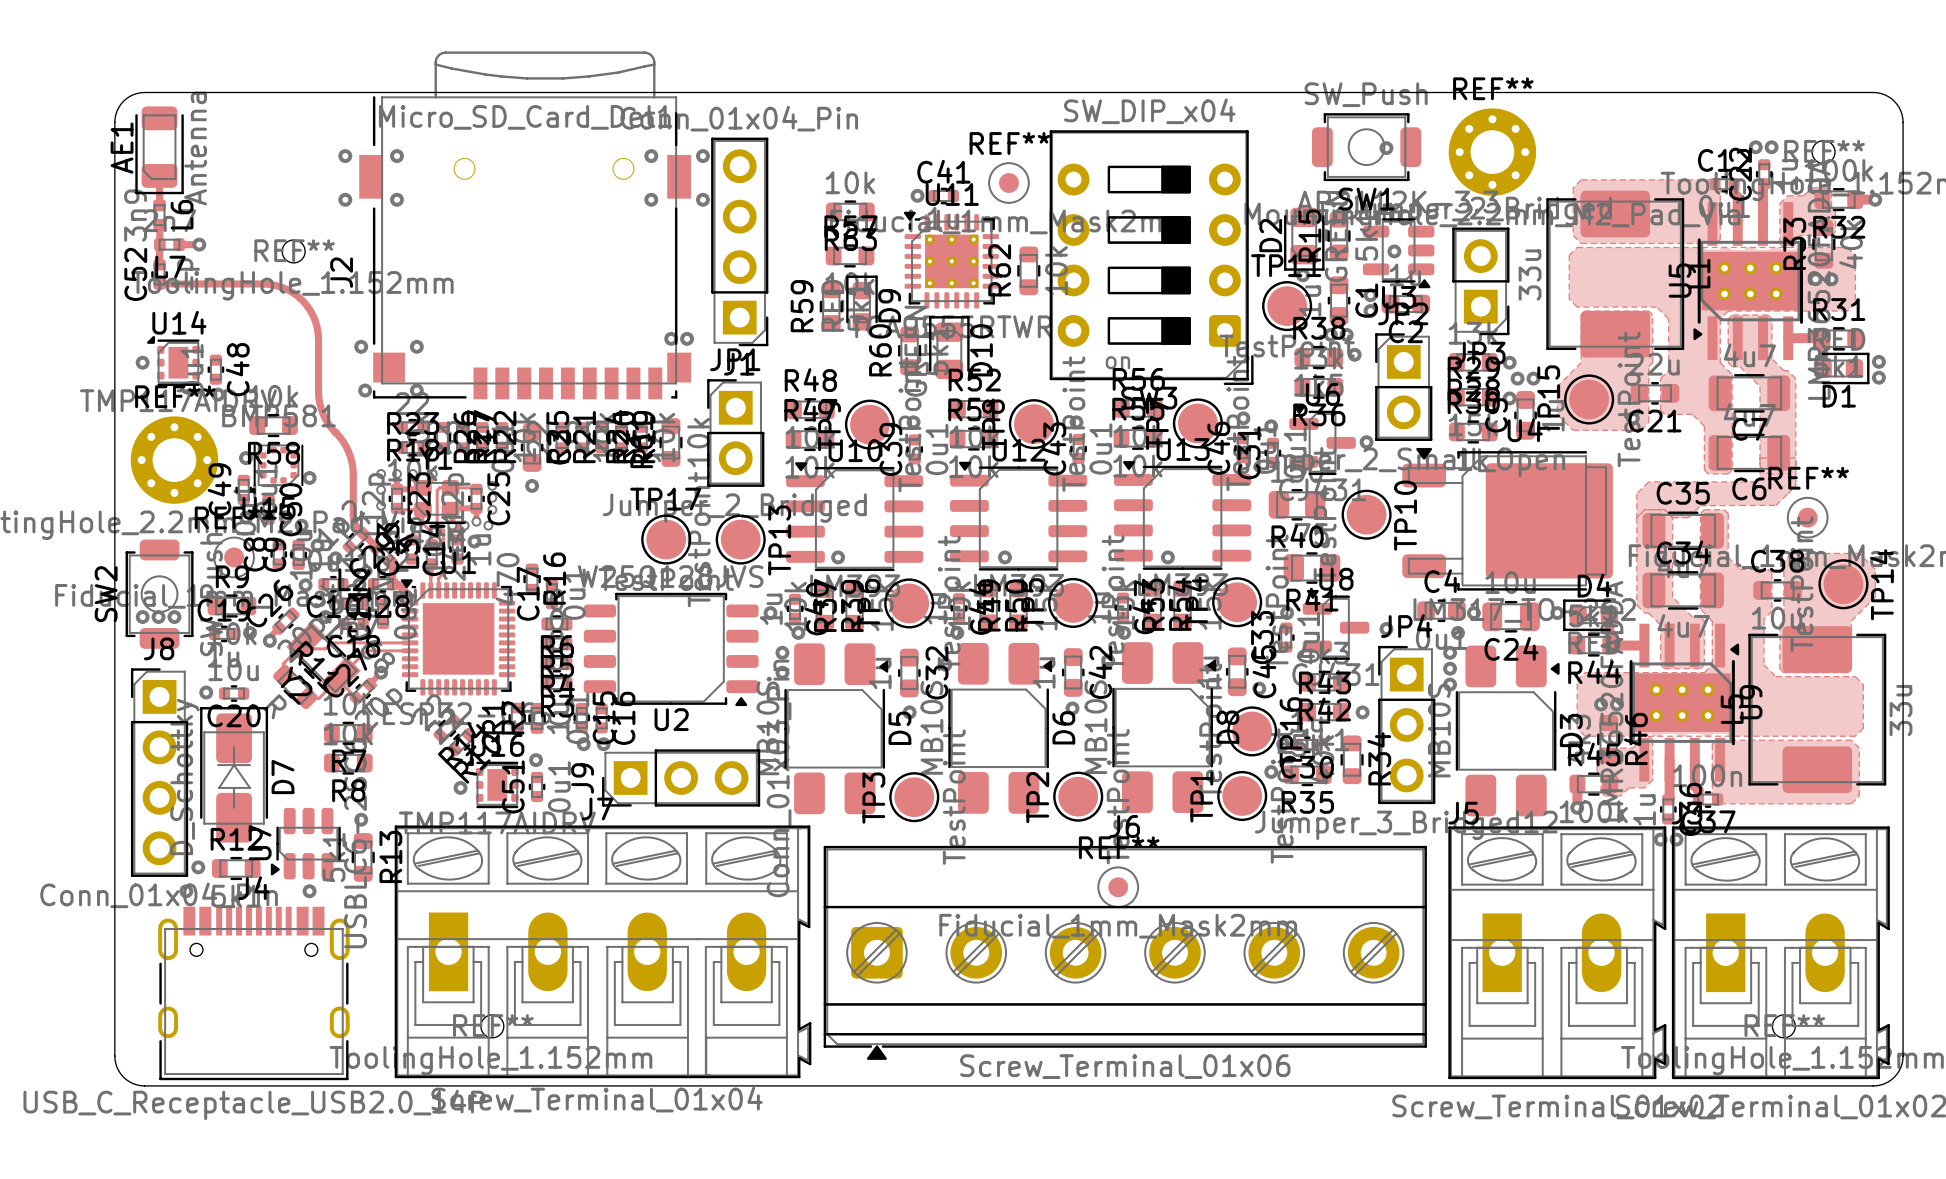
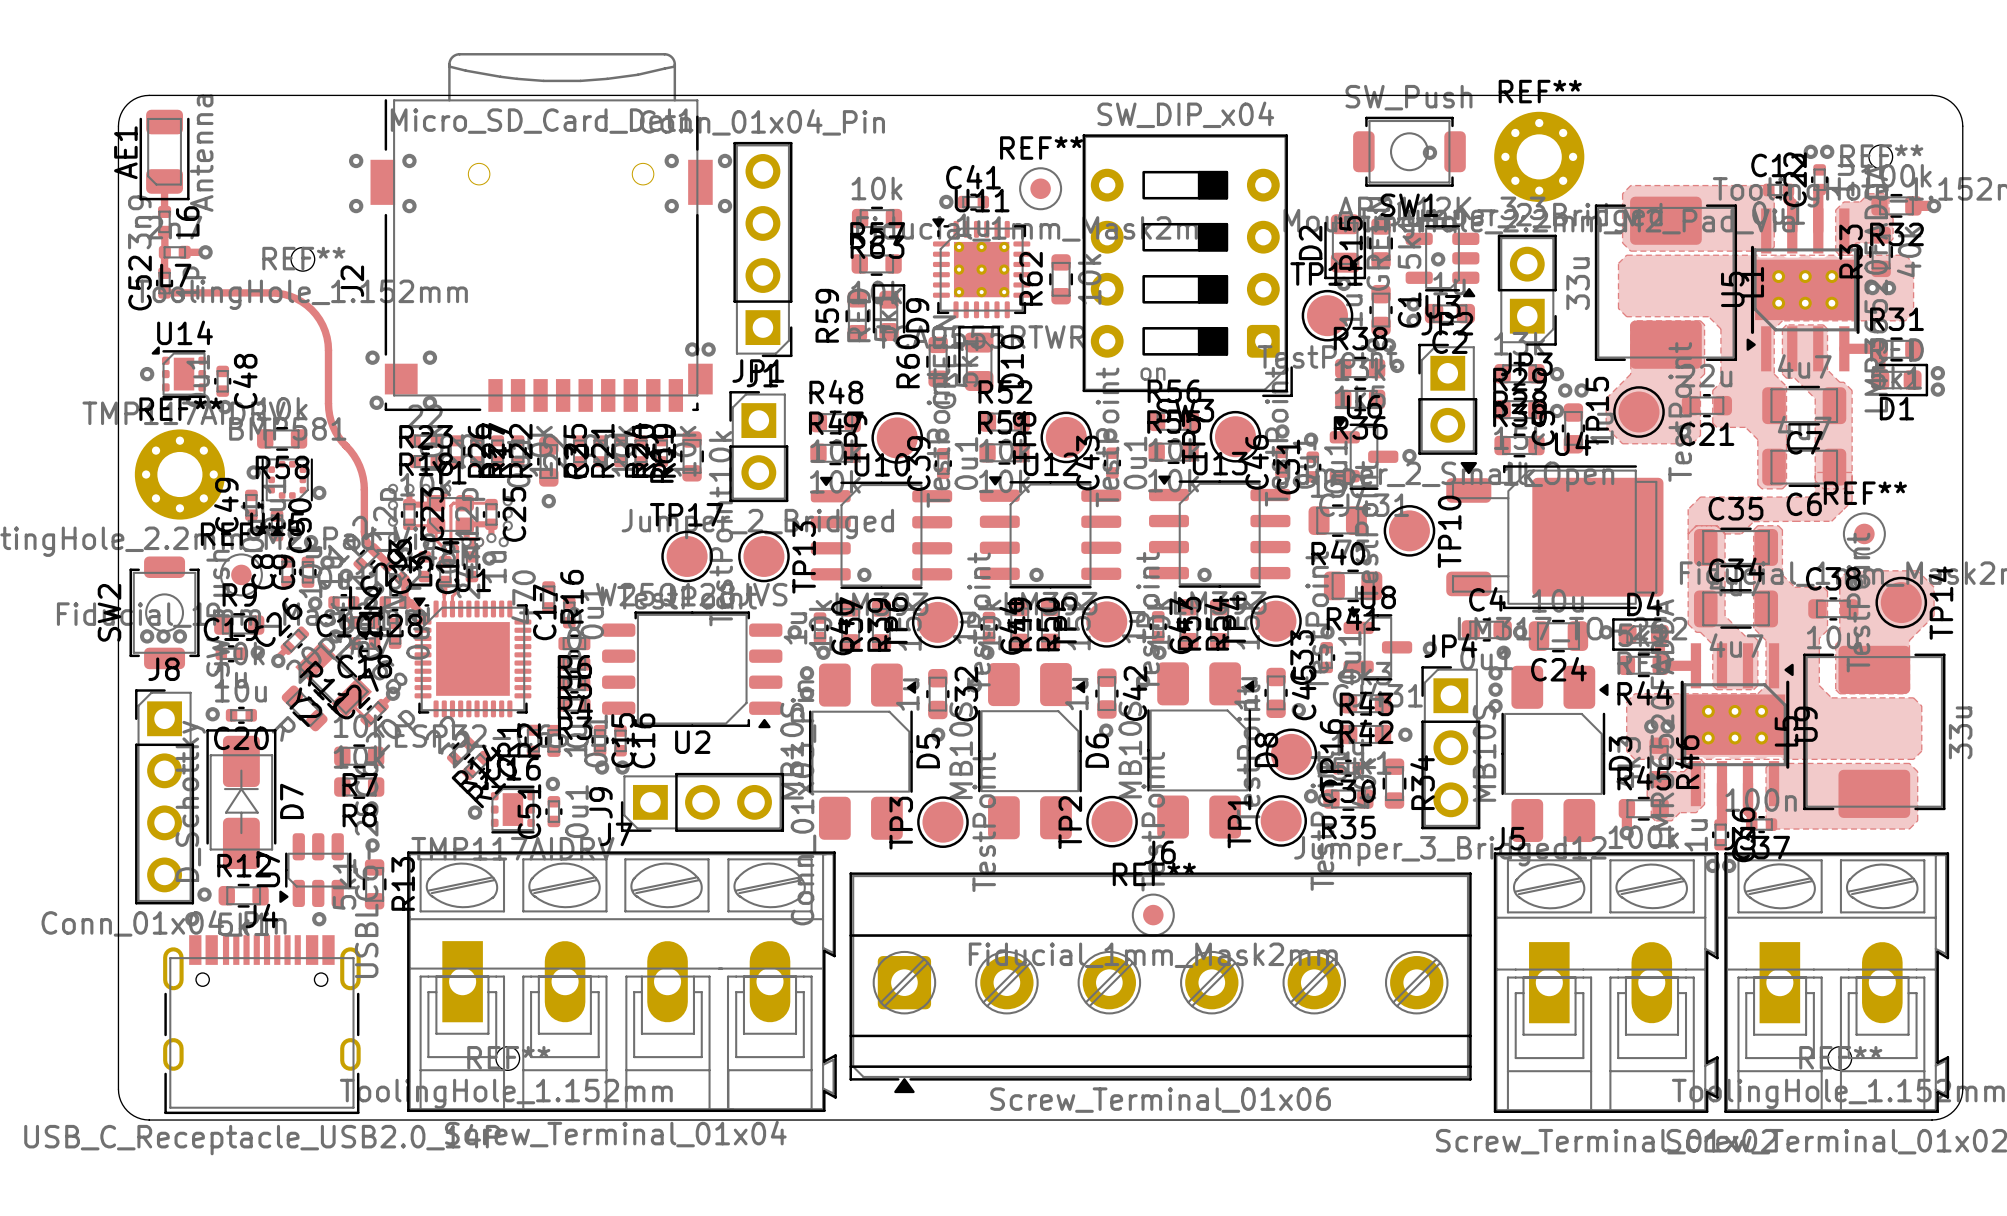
track: (410, 642) (331, 642) (325, 648) (313, 648) (305, 641) (283, 663) (283, 675) -> none
track: (410, 650) (366, 650) (318, 698) (306, 698) -> none

